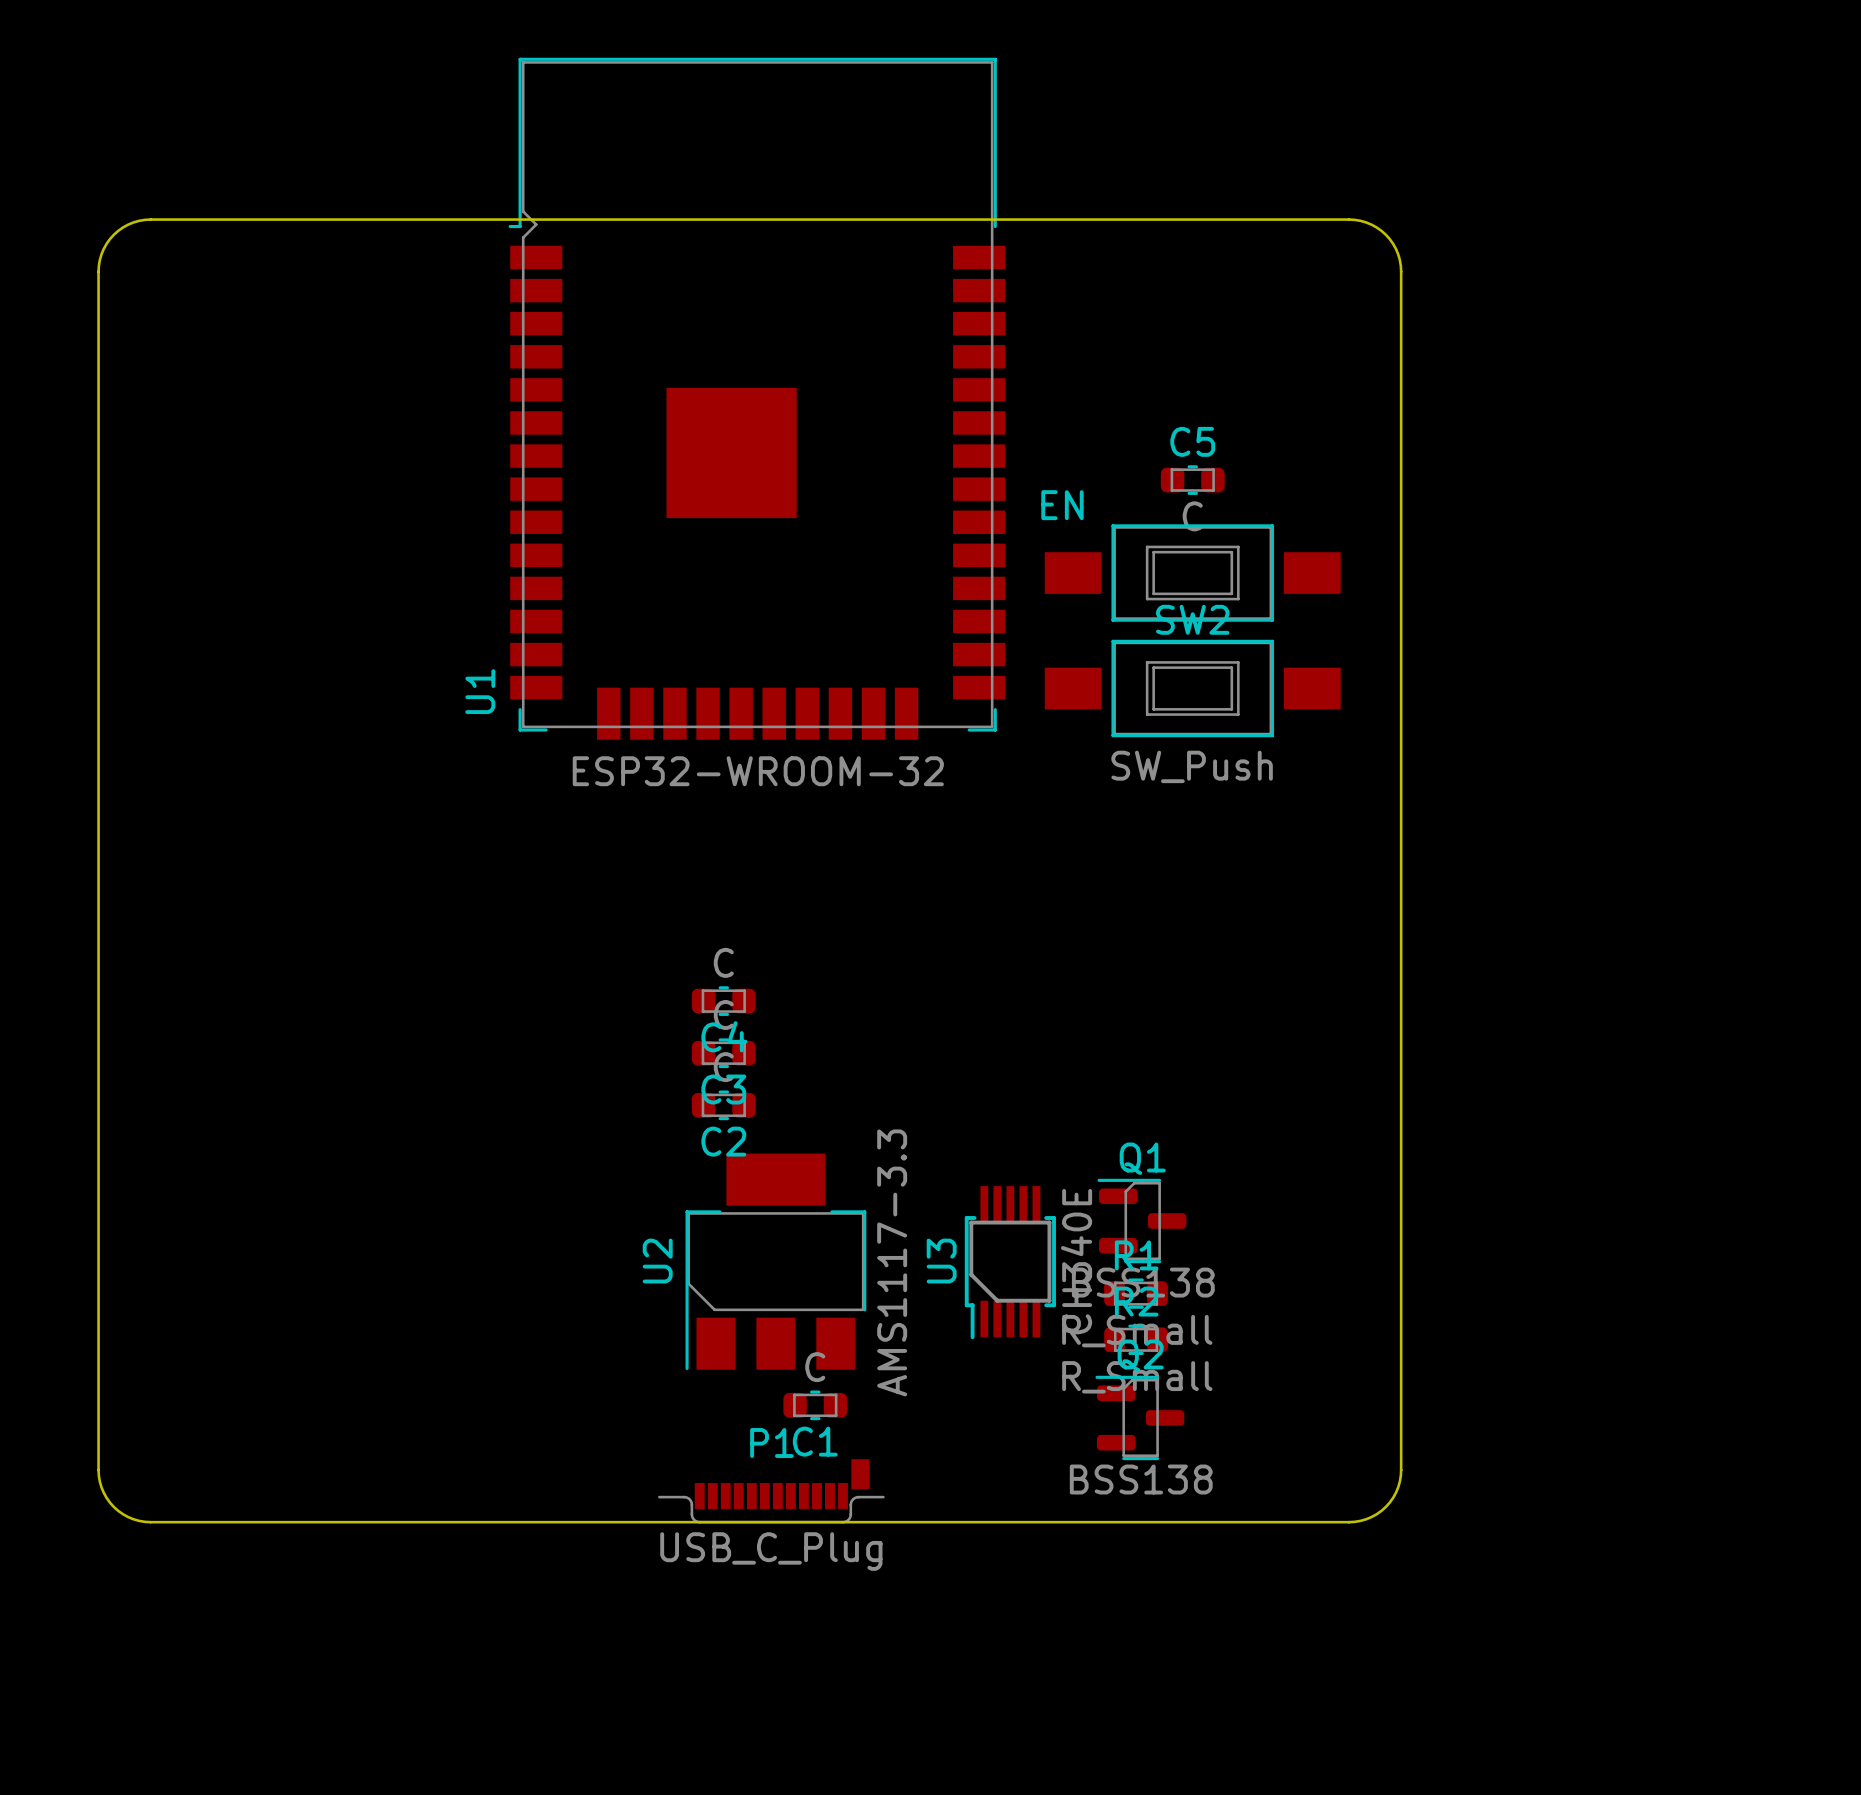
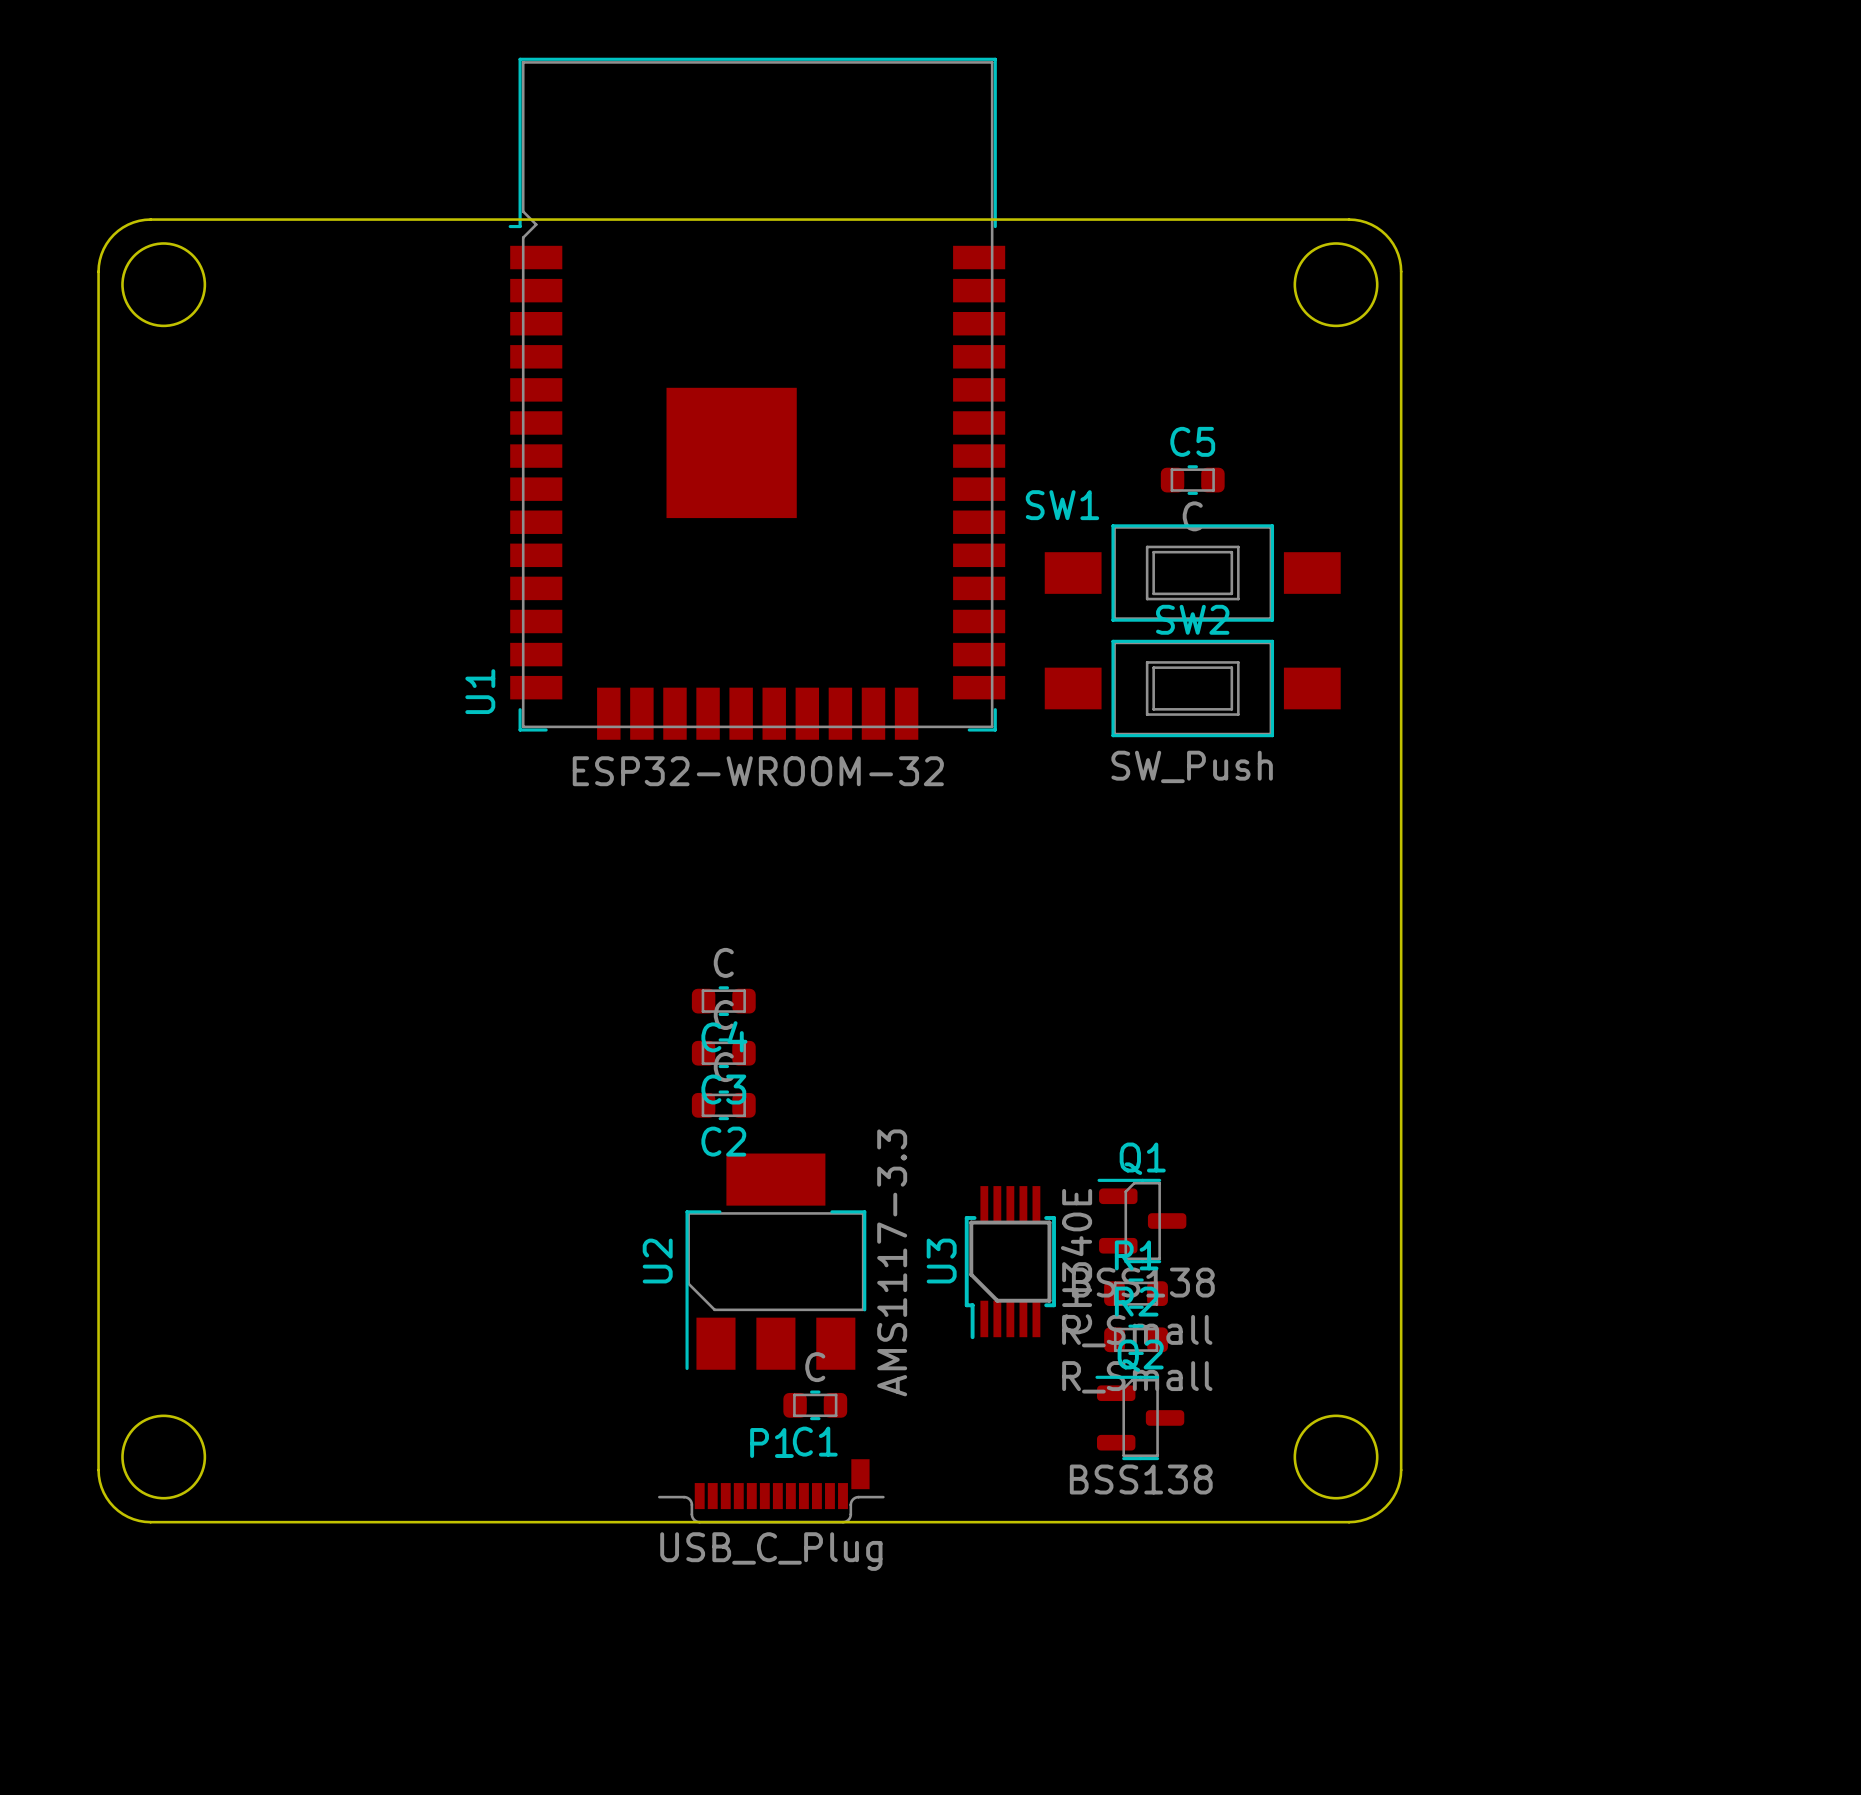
round board edge: none -> [121, 242, 207, 328]
round board edge: none -> [1293, 242, 1379, 328]
EN name: EN (1062, 505) -> SW1 (1062, 505)
round board edge: none -> [121, 1414, 207, 1500]
round board edge: none -> [1293, 1414, 1379, 1500]

